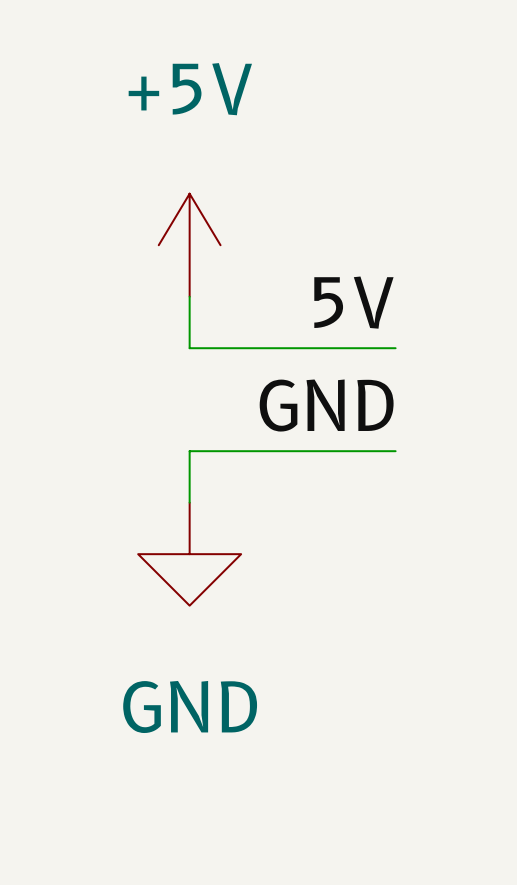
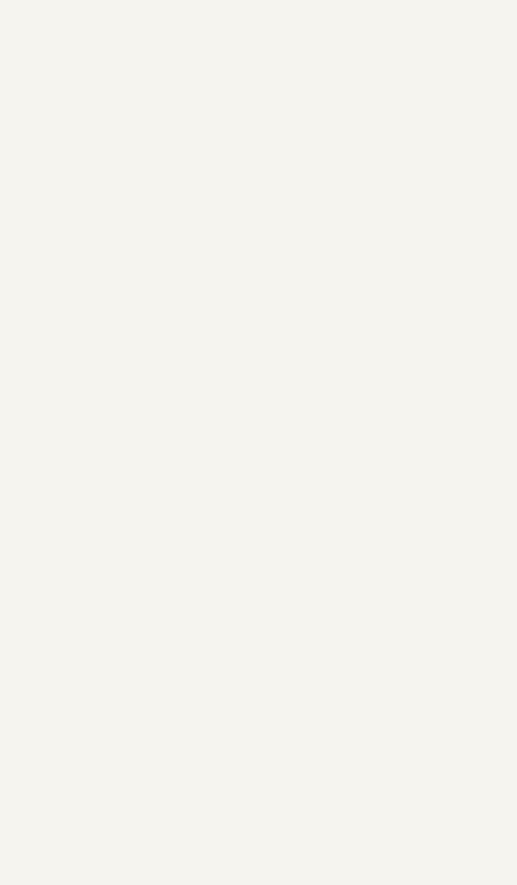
power symbol: +5V (189, 245) -> none
wire: (189, 296) (189, 348) (395, 348) -> none
label: 5V (353, 302) -> none
label: GND (326, 405) -> none
wire: (395, 451) (189, 451) (189, 502) -> none
power symbol: GND (189, 554) -> none

